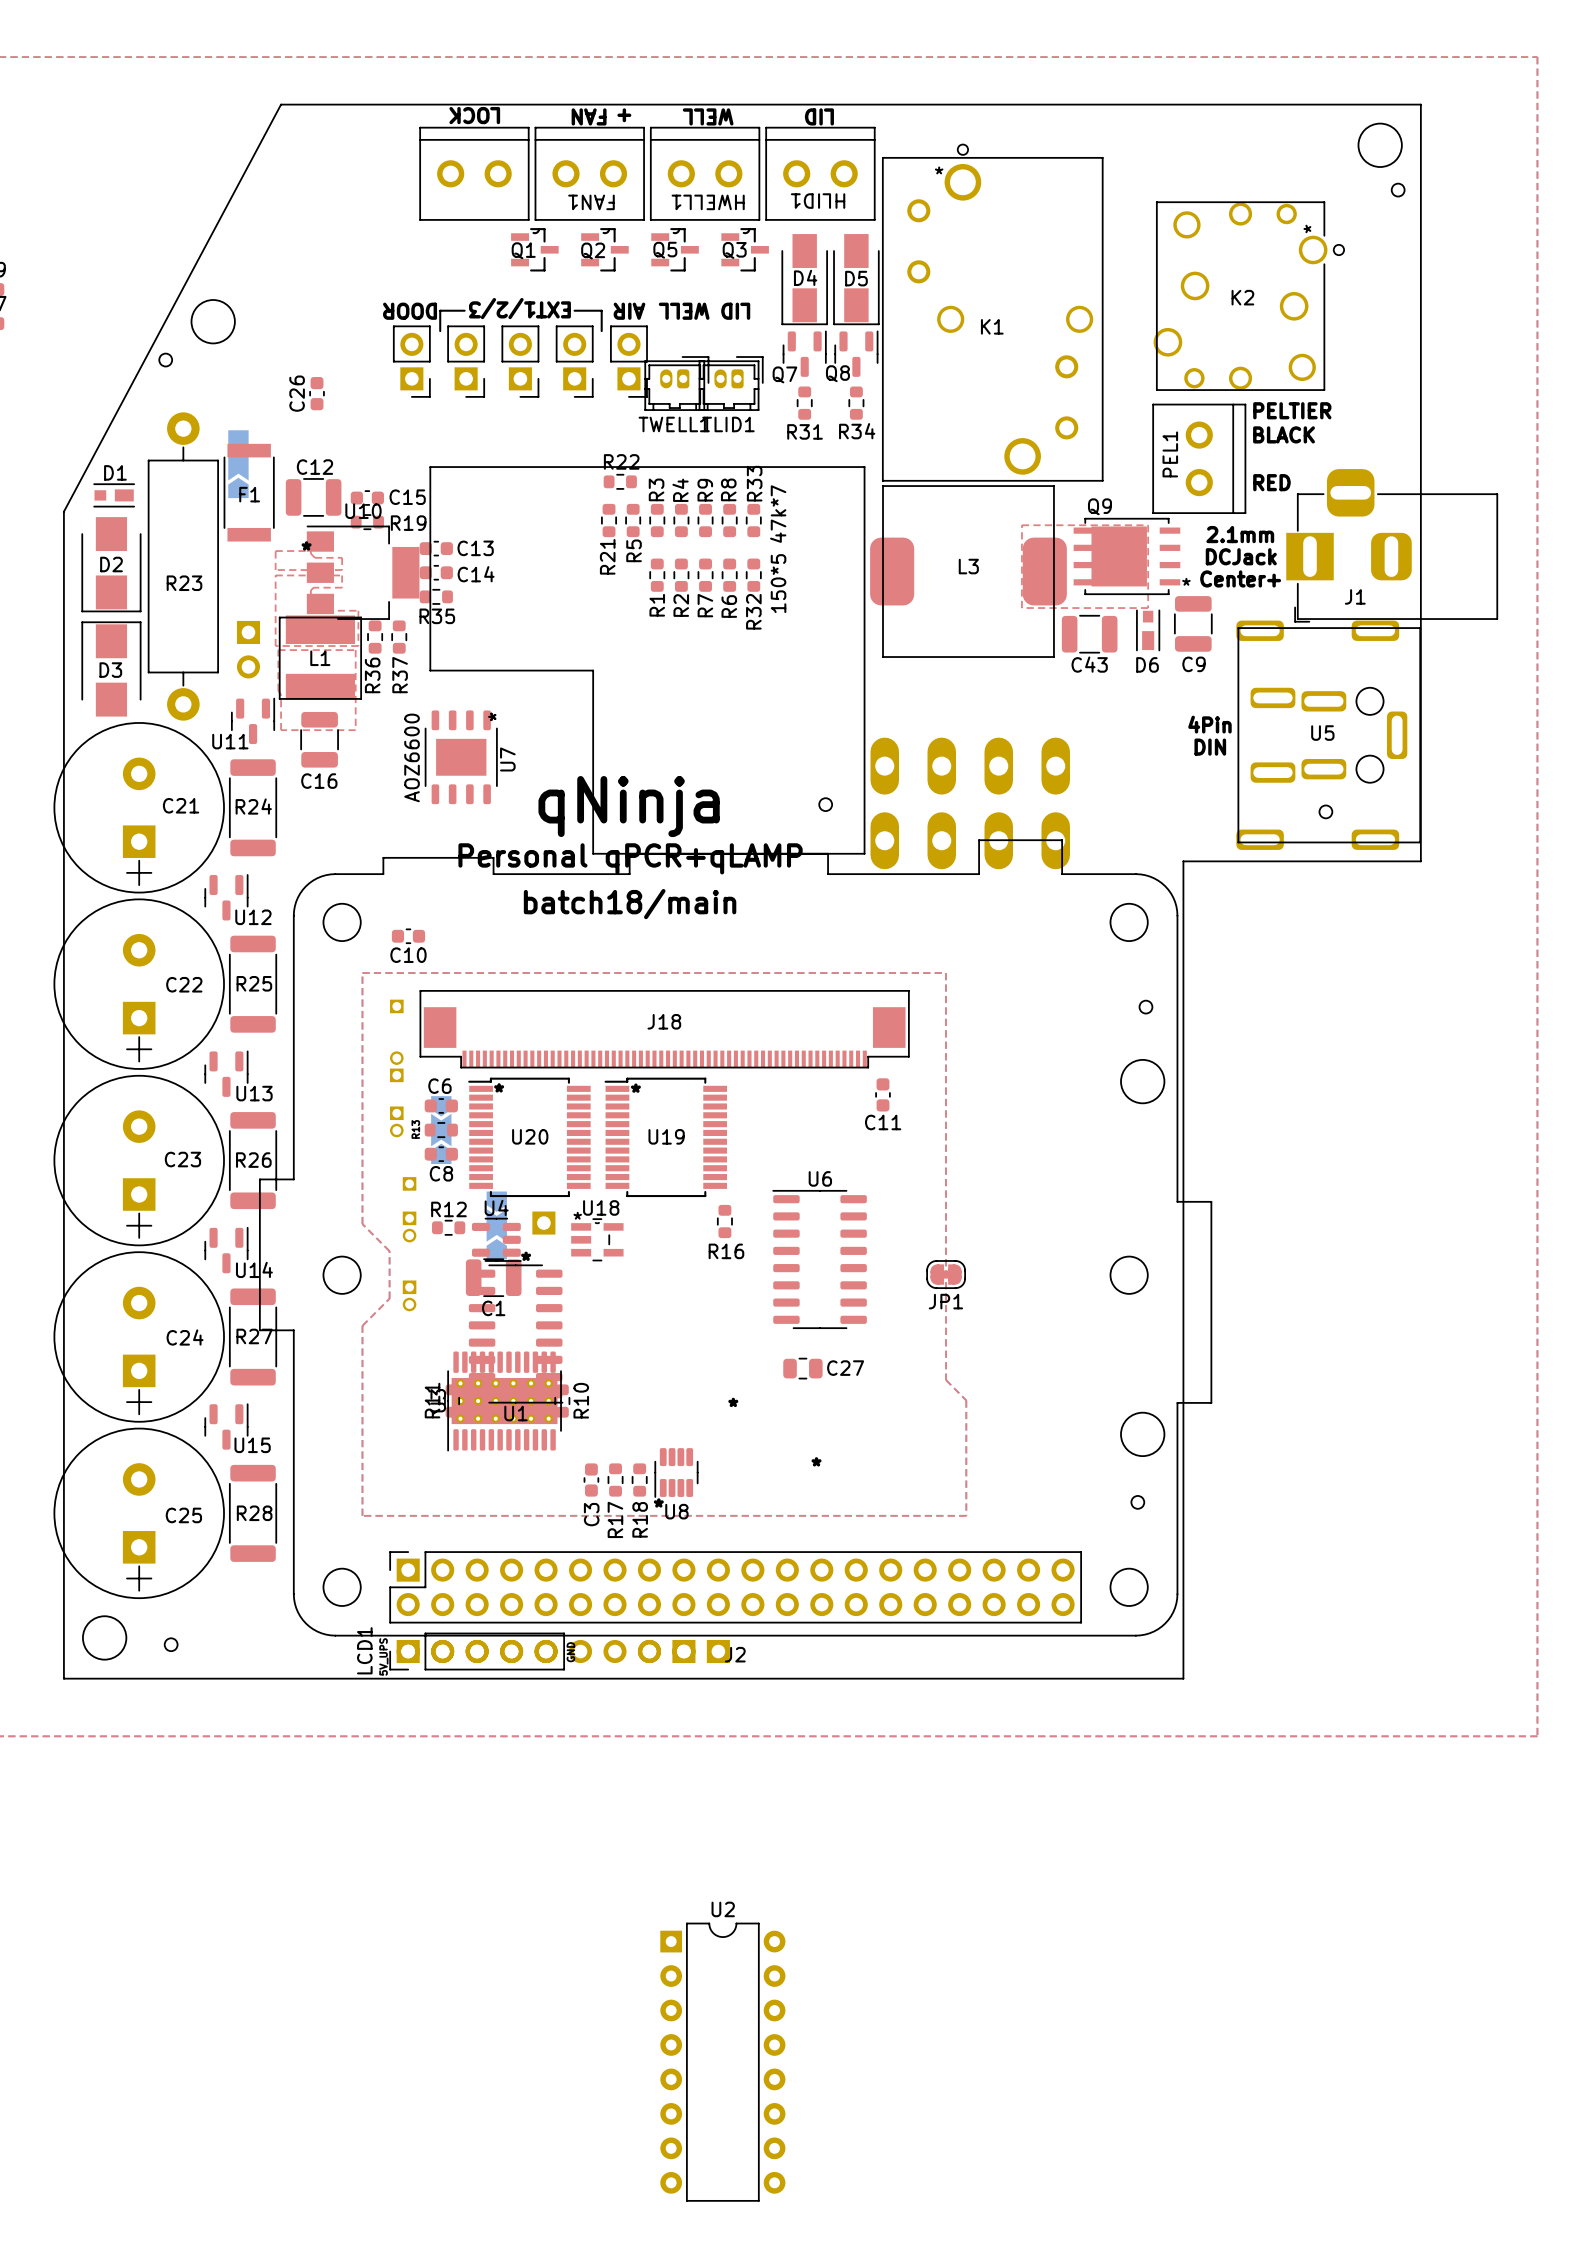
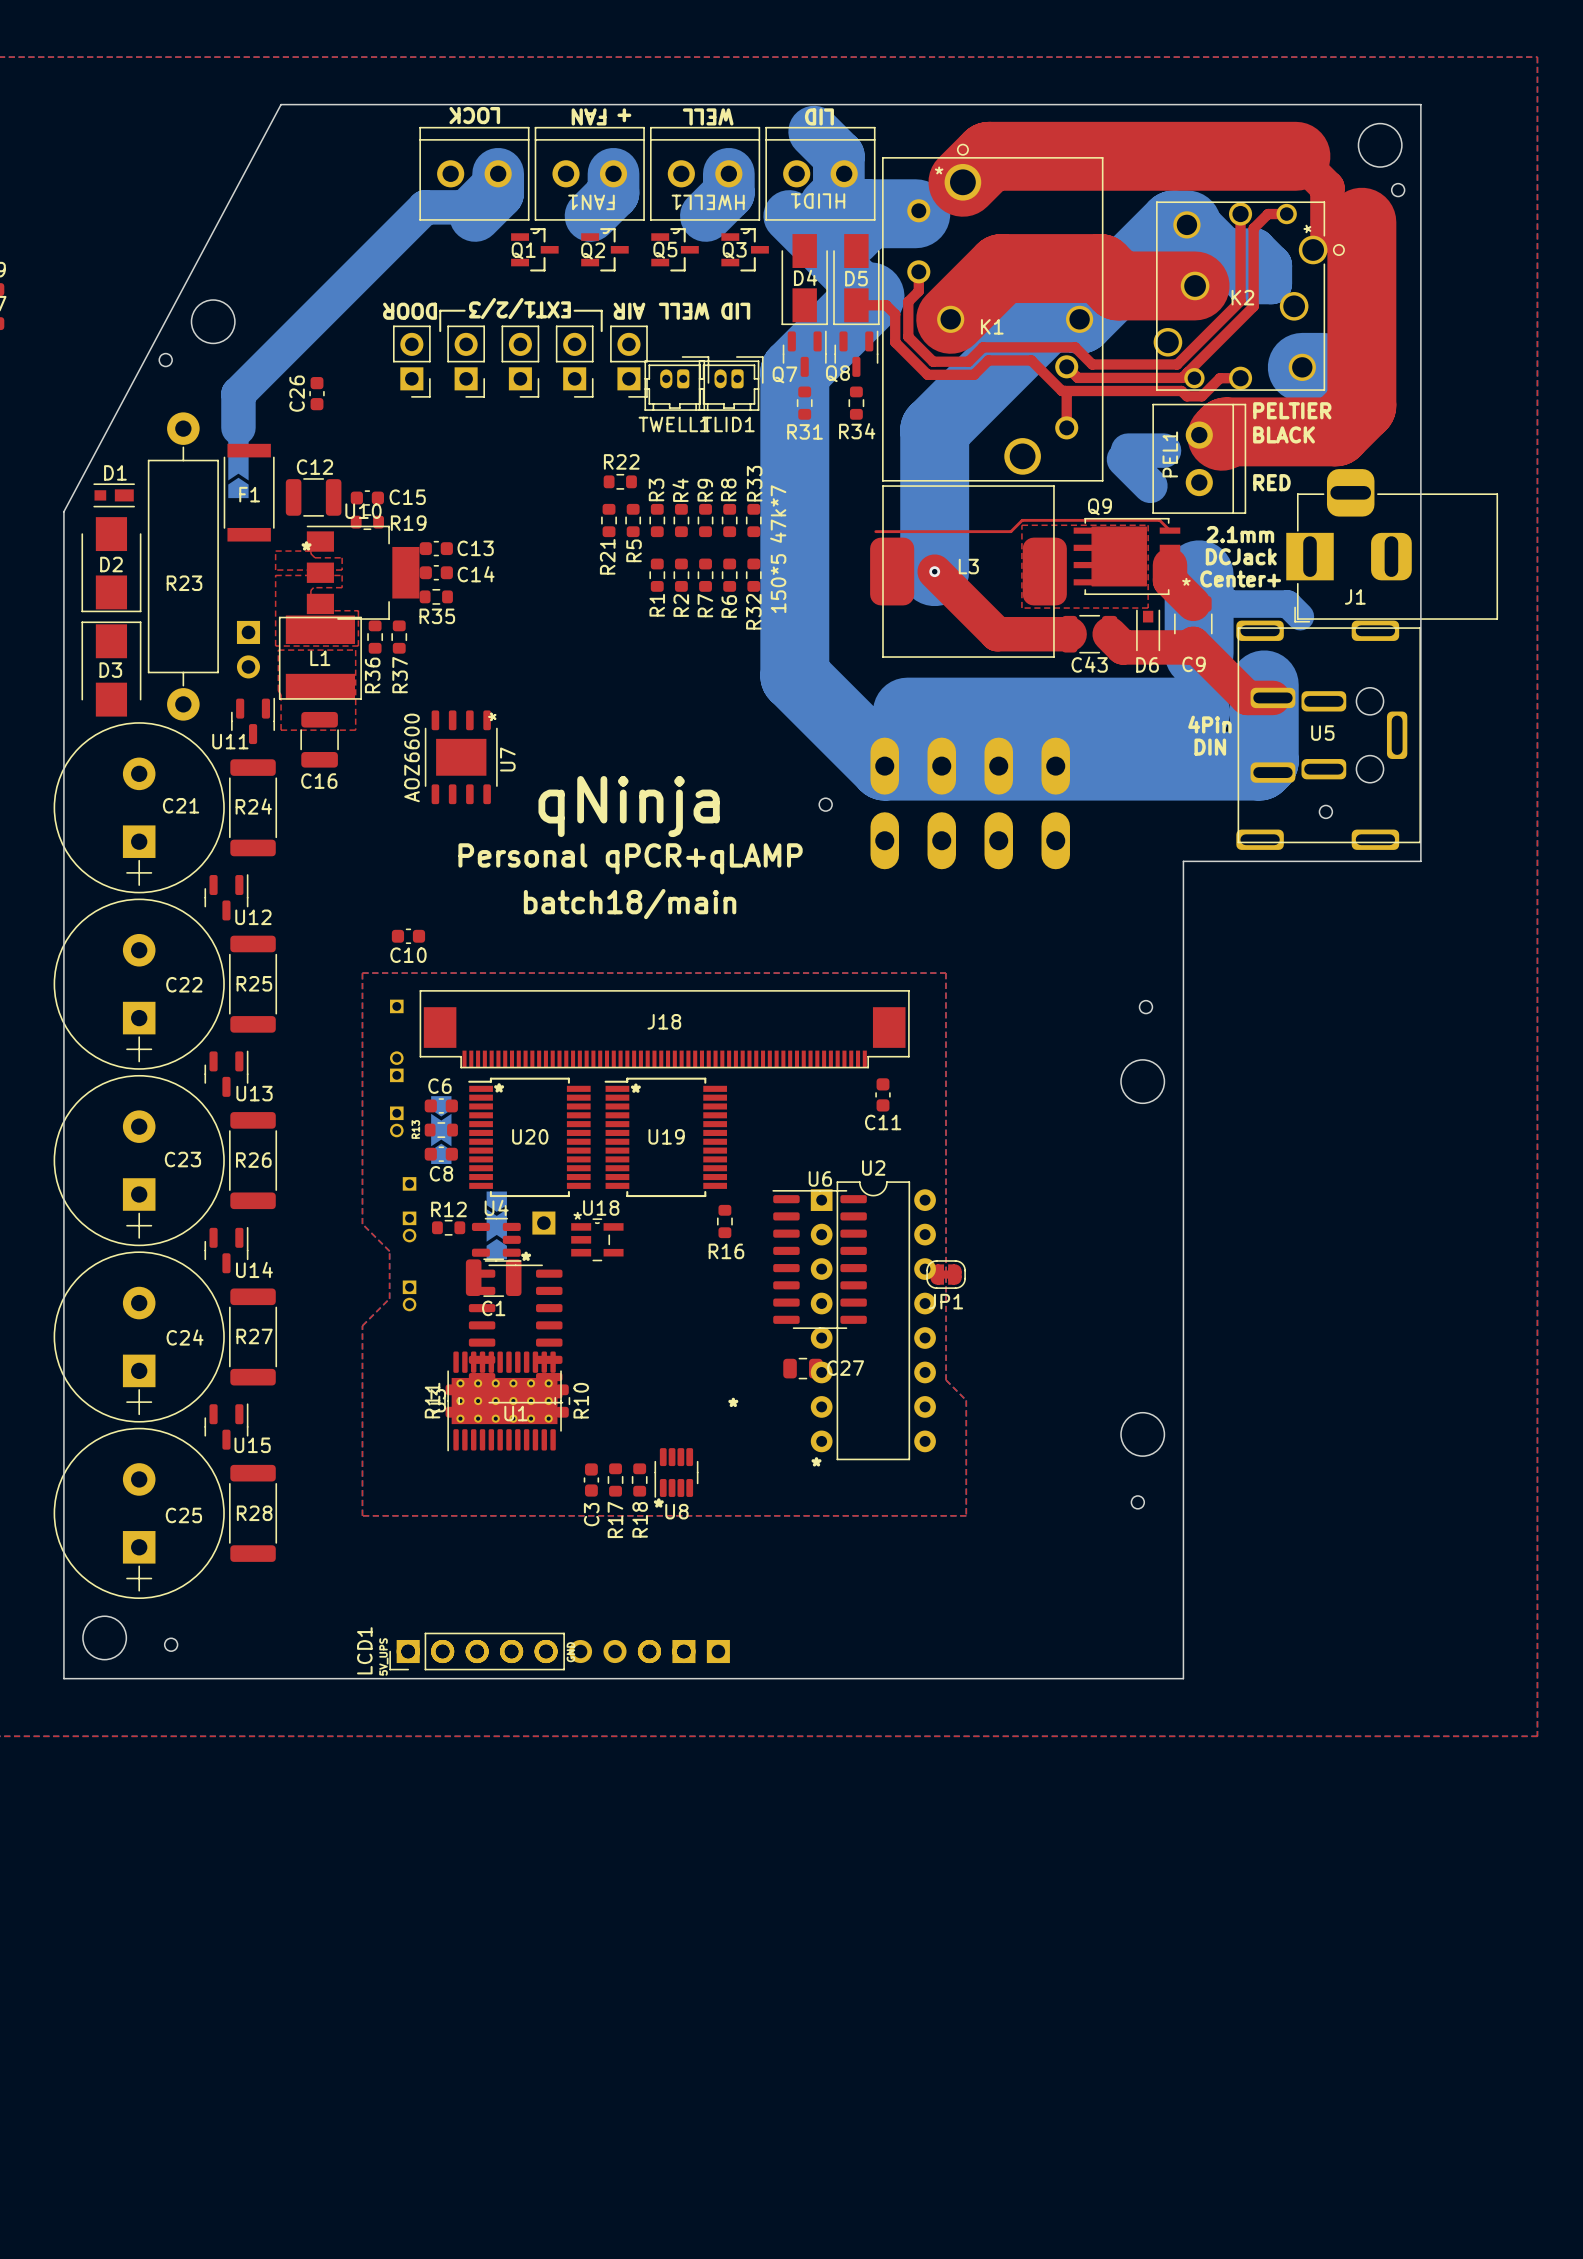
bottom track: none -> (814, 131) (838, 156) (838, 191) (825, 204)
bottom track: none -> (613, 173) (613, 192) (590, 215)
bottom track: none -> (728, 173) (728, 192) (705, 215)
top track: none -> (962, 182) (988, 156) (1295, 156) (1327, 187) (1327, 235)
bottom track: none -> (915, 213) (867, 213) (847, 233)
top track: none -> (1240, 214) (1240, 301) (1177, 364) (1092, 364) (1075, 347) (982, 347) (968, 361) (933, 361) (908, 336) (908, 301) (918, 291) (918, 271)
top track: none -> (1286, 214) (1268, 214) (1253, 228) (1253, 306) (1182, 377) (1077, 377) (1066, 366)
bottom track: none -> (475, 215) (498, 192) (498, 173) (464, 207) (424, 207) (238, 393) (238, 427)
bottom track: none -> (789, 215) (870, 296) (794, 372) (794, 676) (884, 766) (1259, 766) (1264, 761) (1264, 684)
top track: none -> (1361, 222) (1361, 405) (1335, 431) (1226, 431) (1221, 436)
top track: none -> (1195, 285) (1118, 285) (1100, 268) (1001, 268) (950, 319)
bottom track: none -> (1107, 291) (1150, 248) (1210, 248) (1246, 283) (1271, 283) (1271, 265) (1255, 249) (1226, 249) (1201, 224) (1174, 224) (1079, 319) (1046, 318) (934, 429) (934, 571)
top track: none -> (856, 305) (886, 305) (895, 314) (895, 342) (927, 374) (974, 374) (988, 360) (1031, 360) (1061, 390) (1181, 390) (1186, 396) (1201, 396) (1219, 378) (1240, 378)
bottom track: none -> (1302, 367) (1323, 367)
top track: none -> (1065, 390) (1066, 392) (1066, 427)
bottom track: none -> (1128, 450) (1164, 450)
bottom track: none -> (1123, 459) (1150, 485)
top track: none -> (1169, 530) (1159, 520) (1022, 520) (1010, 531) (875, 531)
top track: none -> (1169, 565) (1169, 580) (1193, 603)
top track: none -> (934, 571) (997, 634) (1069, 634)
via: none -> (934, 571)
bottom track: none -> (1300, 616) (1287, 604) (1228, 604) (1199, 574) (1199, 653)
top track: none -> (1109, 634) (1122, 647) (1189, 647) (1193, 643) (1247, 697) (1272, 697)
bottom track: none -> (907, 712) (1195, 712)
J2: (735, 1051) -> none
U2 position: (722, 2062) -> (873, 1320)

